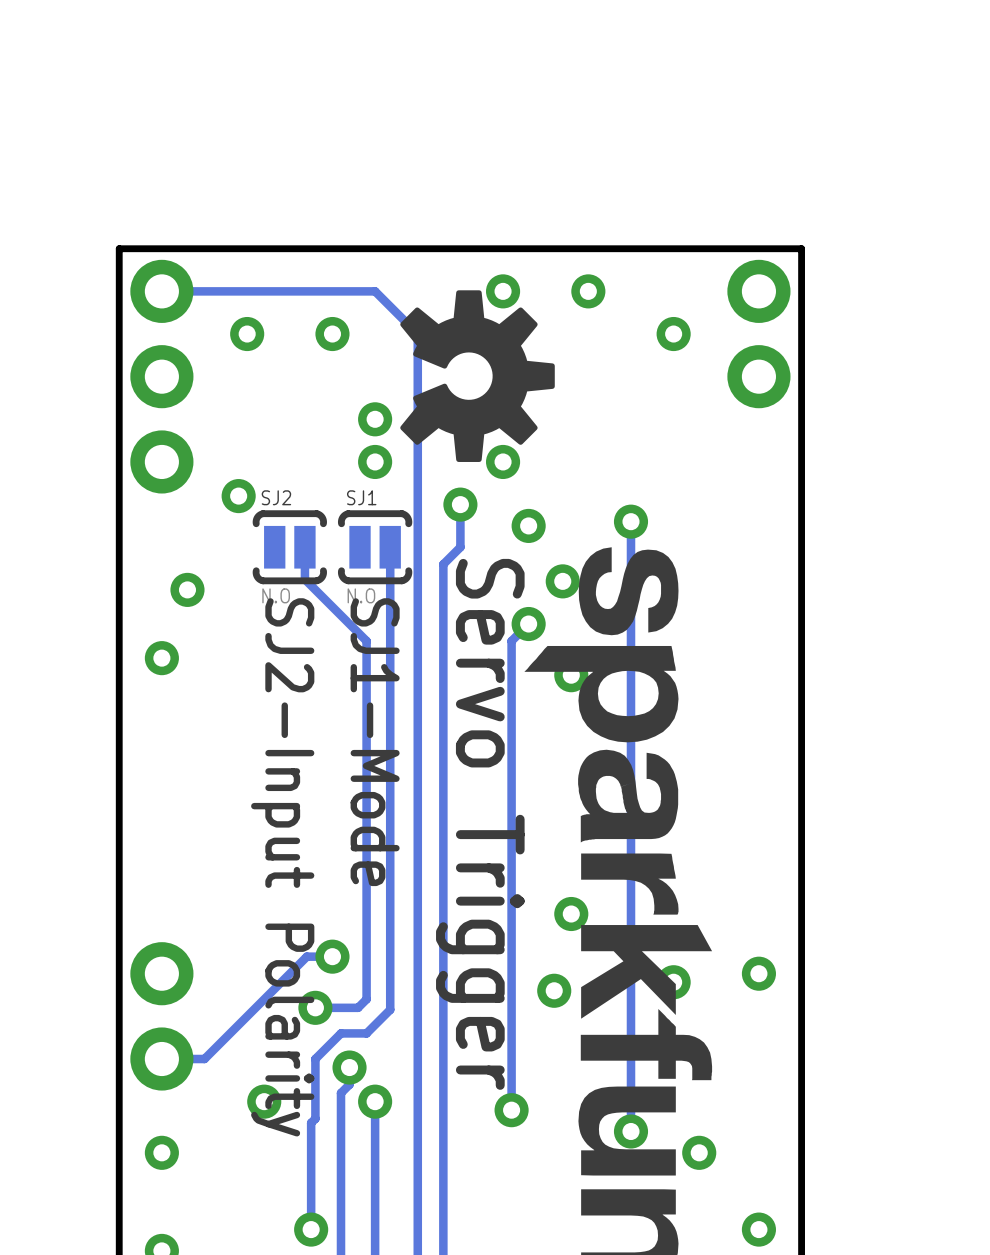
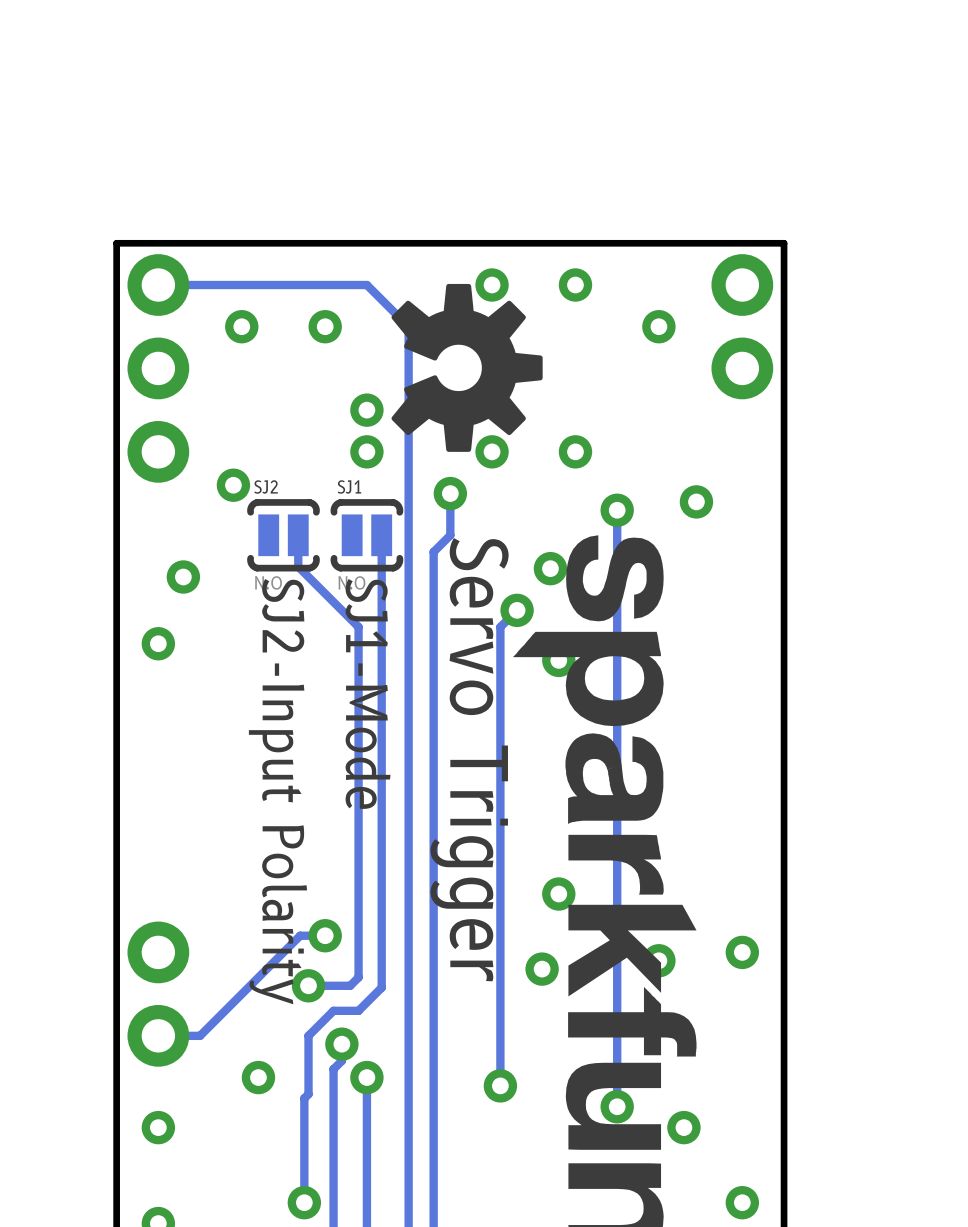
via: none -> (696, 501)
via position: (528, 525) -> (575, 451)

